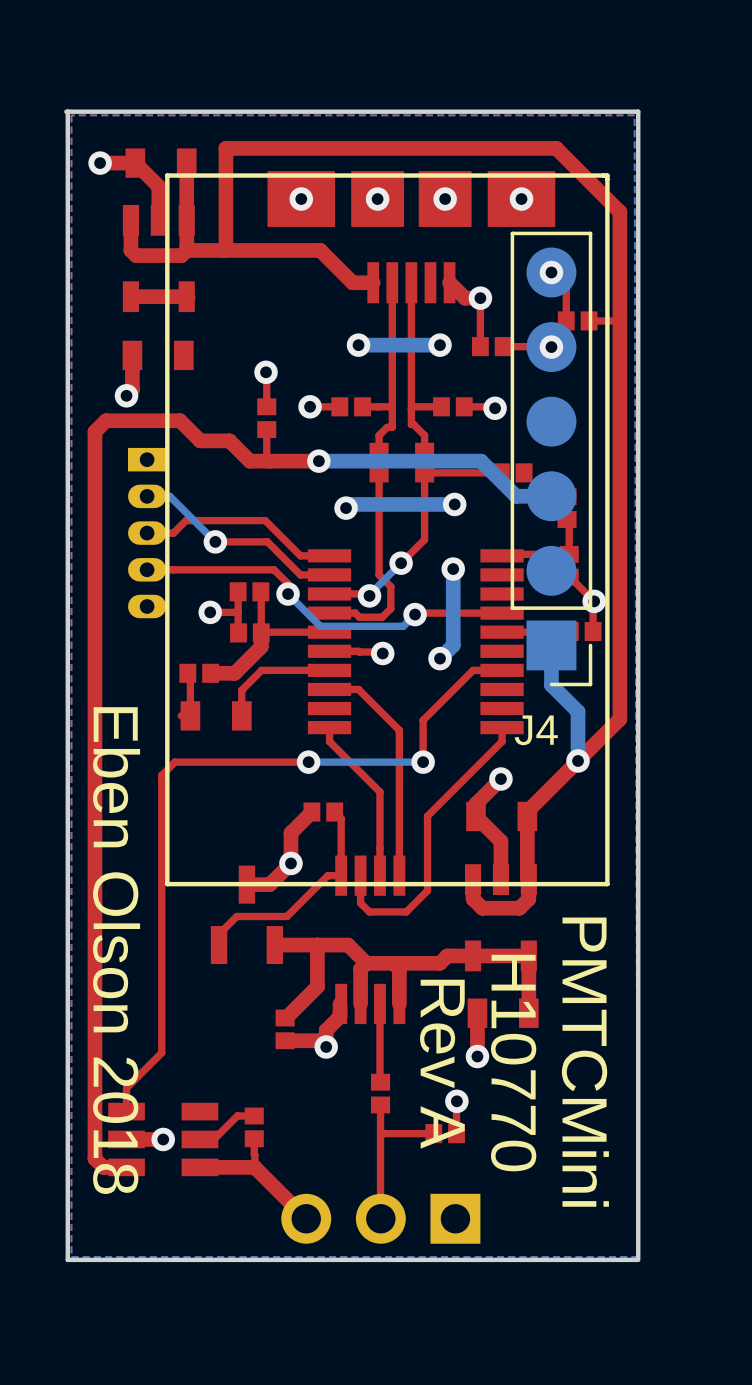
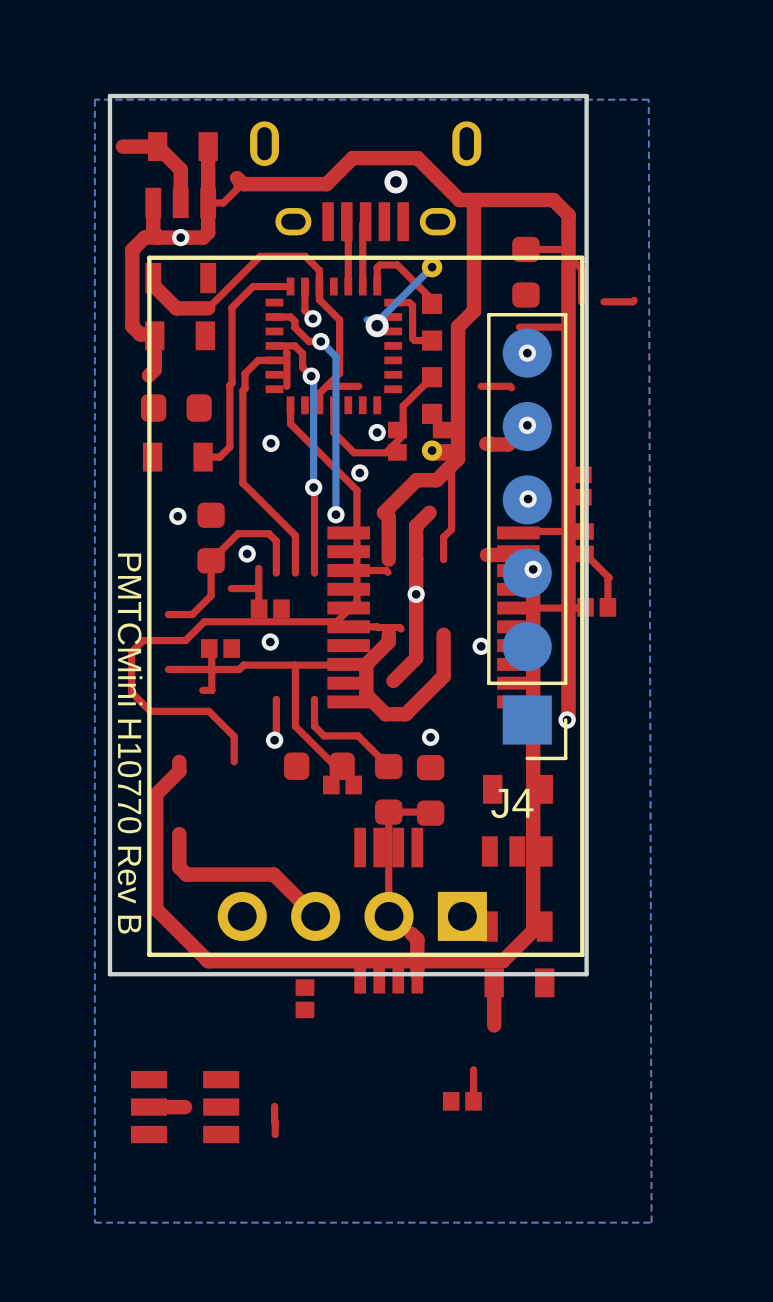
board edge: (67, 111) (67, 1259) (638, 1259) -> none
board edge: (86, 111) (66, 111) -> (109, 96) (109, 974) (586, 974) (586, 96)
board edge: (571, 111) (638, 111) (638, 1258) -> none
via: (100, 163) -> none
part: none -> (365, 181)
via: (301, 199) -> none
via: (445, 199) -> none
via: (521, 199) -> none
top track: none -> (473, 200) (473, 311) (458, 326) (458, 458) (436, 480) (416, 480) (384, 512) (388, 517) (388, 559)
top track: none -> (208, 202) (223, 202) (237, 189) (237, 177) (243, 184) (326, 184) (352, 158) (417, 158) (459, 200) (553, 200) (568, 215) (567, 719)
part: (411, 237) -> none
top track: none -> (346, 221) (348, 286)
top track: none -> (365, 221) (362, 224) (362, 286)
top track: (186, 250) (320, 250) (352, 282) (373, 282) -> none
top track: (223, 250) (225, 247) (225, 148) (556, 148) (619, 211) (619, 719) (527, 811) (528, 898) (519, 908) (482, 908) (473, 898) (473, 879) -> none
top track: none -> (158, 237) (144, 237) (132, 249) (132, 326) (140, 334) (157, 335)
via: none -> (180, 237)
top track: none -> (568, 249) (525, 249)
via: (551, 272) -> none
top track: (449, 282) (464, 298) (480, 298) (480, 346) -> none
bottom track: none -> (432, 267) (379, 319) (367, 319)
part: none -> (525, 272)
top track: (130, 296) (188, 298) -> (153, 278) (153, 285) (176, 308) (208, 308) (260, 256) (305, 256) (319, 270) (319, 299) (339, 319) (339, 373) (319, 393) (319, 405)
top track: (392, 298) (392, 427) (387, 427) (379, 435) (379, 451) -> none
top track: (411, 298) (411, 424) (424, 435) (424, 451) -> none
via: (480, 298) -> none
top track: none -> (290, 286) (253, 286) (232, 307) (229, 447) (219, 457) (203, 457)
top track: none -> (304, 286) (304, 310) (312, 318)
top track: none -> (377, 286) (377, 267) (380, 265) (397, 265) (432, 299) (432, 303)
part: (577, 320) -> none
top track: none -> (393, 302) (409, 302) (412, 305) (412, 338) (414, 340) (432, 340)
top track: none -> (274, 317) (290, 317) (294, 321) (294, 327) (308, 341) (320, 341)
via: none -> (312, 318)
bottom track: (440, 345) (358, 345) -> none
via: (440, 345) -> none
part: (491, 346) -> none
via: (551, 347) -> none
bottom track: none -> (320, 341) (335, 356) (335, 514)
via: none -> (320, 341)
top track: none -> (274, 345) (294, 345) (302, 353) (302, 367) (311, 376)
part: none -> (333, 345)
via: (266, 372) -> none
via: none -> (527, 353)
part: none -> (432, 358)
top track: none -> (274, 360) (258, 360) (245, 373) (245, 388) (242, 390) (242, 483) (295, 535) (295, 573)
via: (126, 395) -> none
bottom track: none -> (311, 376) (313, 378) (313, 487)
top track: none -> (432, 377) (403, 406) (403, 435) (385, 452) (354, 452) (333, 432) (333, 405)
via position: (310, 406) -> (311, 376)
part: (351, 406) -> none
top track: (392, 406) (362, 406) -> none
top track: (441, 406) (411, 408) -> none
part: (452, 406) -> none
via: (495, 408) -> none
part: (266, 418) -> none
top track: none -> (290, 405) (290, 423) (356, 490) (356, 601) (336, 621) (204, 621) (185, 640) (143, 640) (131, 652) (131, 692) (150, 711) (208, 711) (234, 736) (234, 761)
part: none -> (176, 408)
top track: (266, 429) (266, 458) (269, 461) -> none
top track: none -> (527, 425) (508, 444) (486, 443)
via: none -> (527, 425)
via: none -> (377, 432)
bottom track: (318, 461) (481, 461) (516, 496) (551, 496) -> none
top track: (318, 461) (249, 461) (229, 440) (200, 440) (180, 420) (105, 420) (94, 431) (94, 1158) (103, 1167) (126, 1167) -> none
via: (318, 461) -> none
via: none -> (271, 443)
top track: (501, 472) (425, 472) (424, 539) (401, 563) -> none
part: (512, 472) -> none
top track: (379, 473) (379, 574) (390, 586) (390, 608) (382, 617) (359, 617) (355, 613) (329, 613) -> none
top track: none -> (447, 469) (451, 473) (451, 529) (443, 537) (443, 559)
bottom track: (147, 496) (169, 496) (215, 541) -> none
bottom track: (454, 504) (349, 504) (346, 508) -> none
via: (454, 504) -> none
via position: (346, 508) -> (359, 473)
top track: none -> (313, 487) (314, 573)
via: none -> (313, 487)
via: none -> (528, 499)
J4 position: (387, 529) -> (365, 606)
top track: (147, 533) (173, 533) (186, 520) (265, 520) (300, 555) (329, 555) -> none
part: (147, 533) -> none
top track: none -> (429, 512) (416, 526) (416, 658) (393, 680)
via: none -> (335, 514)
via: none -> (177, 516)
top track: (215, 538) (215, 541) (267, 541) (300, 574) (329, 574) -> none
via: (215, 541) -> none
part: none -> (211, 538)
bottom track: (401, 563) (369, 595) -> none
via: (401, 563) -> none
top track: (147, 569) (274, 569) (288, 583) (288, 594) -> none
bottom track: (453, 569) (453, 645) (440, 658) -> none
via: (453, 569) -> none
via: none -> (247, 553)
top track: none -> (486, 554) (518, 554) (533, 569) (533, 930) (502, 961) (208, 961) (156, 909) (156, 794) (179, 771) (179, 761)
part: (249, 591) -> none
top track: (261, 592) (261, 632) -> none
via: none -> (533, 569)
bottom track: (288, 594) (320, 626) (403, 626) (415, 614) -> none
via: (288, 594) -> none
via: (369, 595) -> none
top track: none -> (276, 573) (276, 541) (268, 533) (238, 533) (211, 560) (211, 595) (192, 614) (168, 614)
via: (594, 601) -> none
via: (210, 612) -> none
top track: (502, 613) (415, 614) -> none
via position: (415, 614) -> (416, 594)
top track: (261, 632) (261, 646) (234, 673) (210, 673) -> none
top track: (329, 632) (261, 632) -> none
bottom track: (551, 645) (551, 685) (578, 711) (578, 760) -> none
via: (382, 653) -> none
via: (440, 658) -> none
top track: none -> (388, 634) (388, 642) (366, 664)
top track: none -> (443, 634) (443, 676) (405, 714) (385, 714) (366, 694) (366, 664)
via: none -> (270, 642)
top track: (329, 670) (261, 670) (241, 690) (241, 715) -> none
top track: (502, 670) (473, 670) (423, 720) (423, 762) -> none
via: none -> (481, 646)
top track: (329, 689) (358, 689) (399, 730) (399, 875) -> none
top track: none -> (366, 664) (243, 665) (239, 669) (168, 669)
top track: none -> (294, 665) (295, 726) (335, 766) (342, 766) (335, 759)
part position: (216, 715) -> (177, 457)
top track: none -> (276, 699) (276, 738)
top track: (329, 727) (329, 741) (379, 792) (379, 875) -> none
top track: (502, 727) (502, 741) (427, 816) (427, 890) (406, 911) (369, 911) (360, 903) (360, 875) -> none
via: none -> (567, 719)
via size: [411, 750, 435, 774] -> [421, 728, 440, 746]
via: (578, 760) -> none
top track: (304, 762) (174, 762) (161, 775) (161, 1052) (126, 1088) (126, 1111) -> (324, 735) (314, 726) (314, 699)
top track: none -> (328, 735) (358, 735) (388, 766)
via: (308, 762) -> none
bottom track: (423, 762) (308, 762) -> none
via: none -> (274, 740)
text: none -> PMTCMini H10770 Rev B (130, 743)
top track: (500, 779) (475, 803) (475, 816) (500, 841) (500, 879) -> none
via: (500, 779) -> none
part: none -> (319, 766)
top track: (311, 812) (290, 832) (290, 863) (269, 884) (246, 884) -> none
top track: (334, 812) (341, 818) (341, 875) (327, 875) (287, 916) (236, 916) (219, 934) (219, 945) -> none
part: none -> (388, 789)
part: none -> (430, 790)
top track: none -> (430, 813) (388, 812) (388, 916)
top track: none -> (179, 834) (179, 867) (186, 874) (273, 874) (315, 916)
via: (290, 863) -> none
part: (246, 914) -> none
top track: (274, 945) (348, 945) (366, 963) -> none
top track: (317, 945) (317, 986) (285, 1017) -> none
part: none -> (352, 916)
text: Eben Olson 2018 (116, 950) -> none
top track: (366, 963) (360, 969) (360, 1003) -> none
top track: (366, 963) (440, 963) (447, 955) (528, 955) (528, 1013) -> none
top track: (340, 1003) (340, 1016) (326, 1030) (326, 1046) (319, 1040) (285, 1040) -> none
top track: (379, 1003) (380, 1082) -> none
via: (326, 1046) -> none
via: (477, 1056) -> none
text: PMTCMini (585, 1062) -> none
text: H10770 (513, 1063) -> none
text: Rev A (442, 1064) -> none
part: (380, 1093) -> none
via: (456, 1101) -> none
top track: (380, 1104) (380, 1218) -> none
top track: (254, 1115) (237, 1115) (213, 1139) (199, 1139) -> none
part: (254, 1127) -> none
top track: (433, 1133) (380, 1133) -> none
via: (163, 1139) -> none
top track: (199, 1167) (254, 1167) (306, 1218) (275, 1188) -> none
part: (380, 1218) -> none

